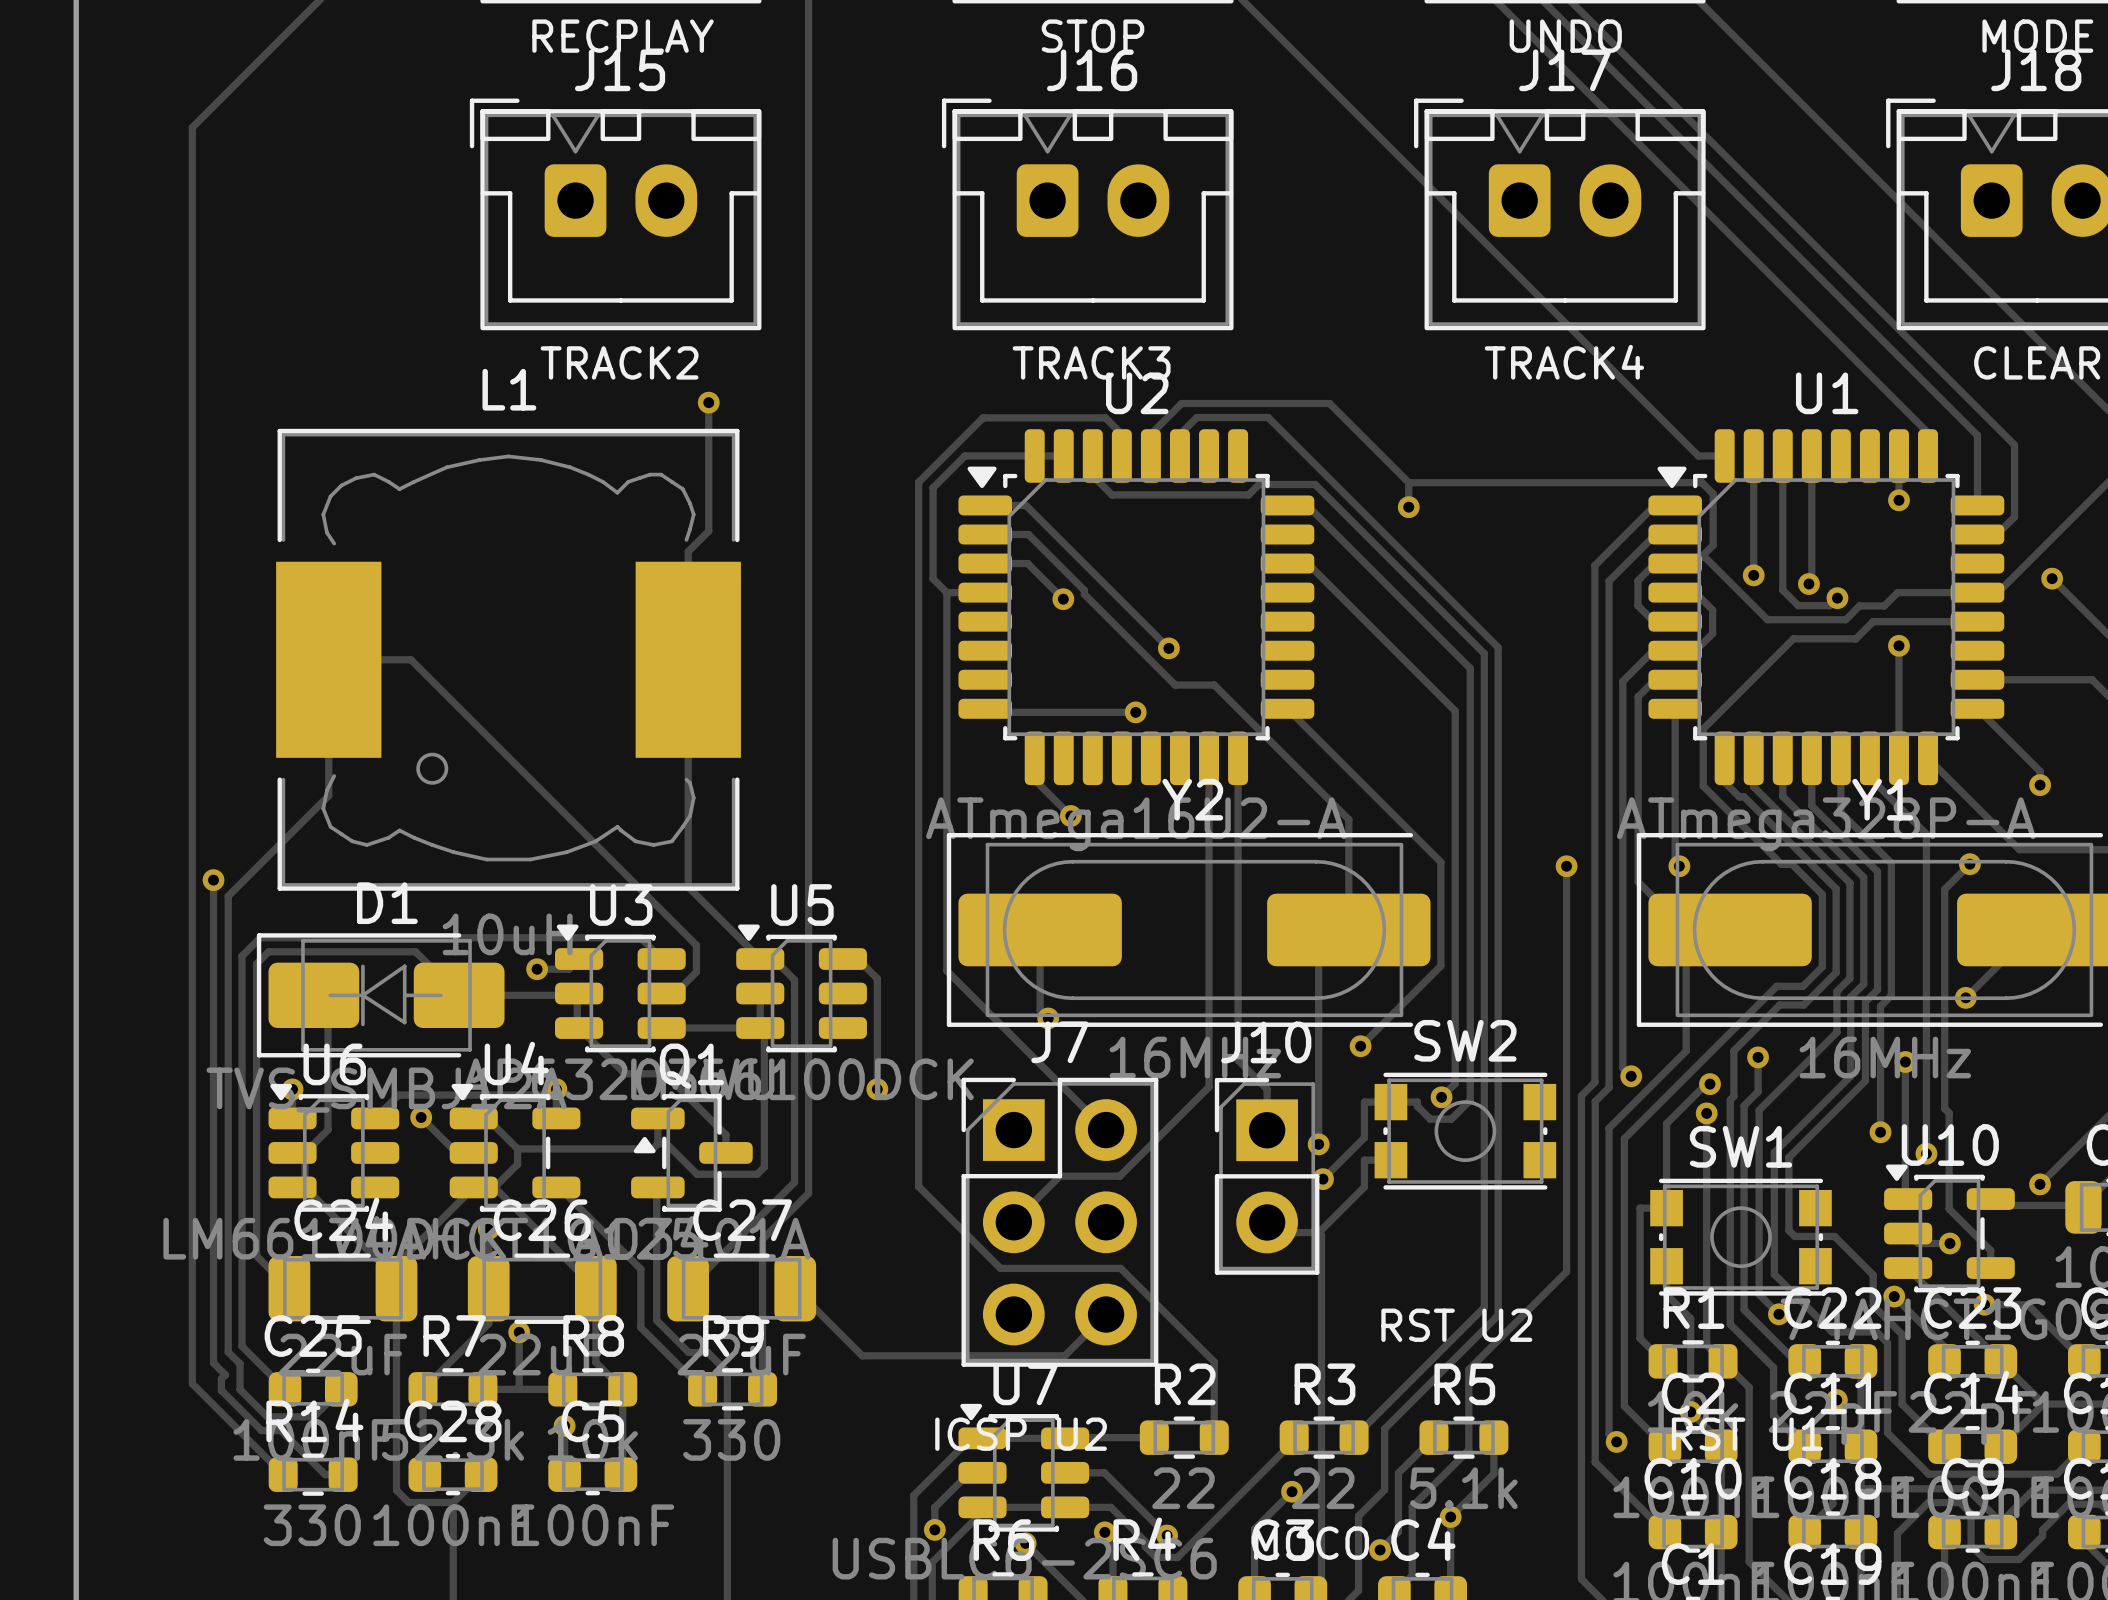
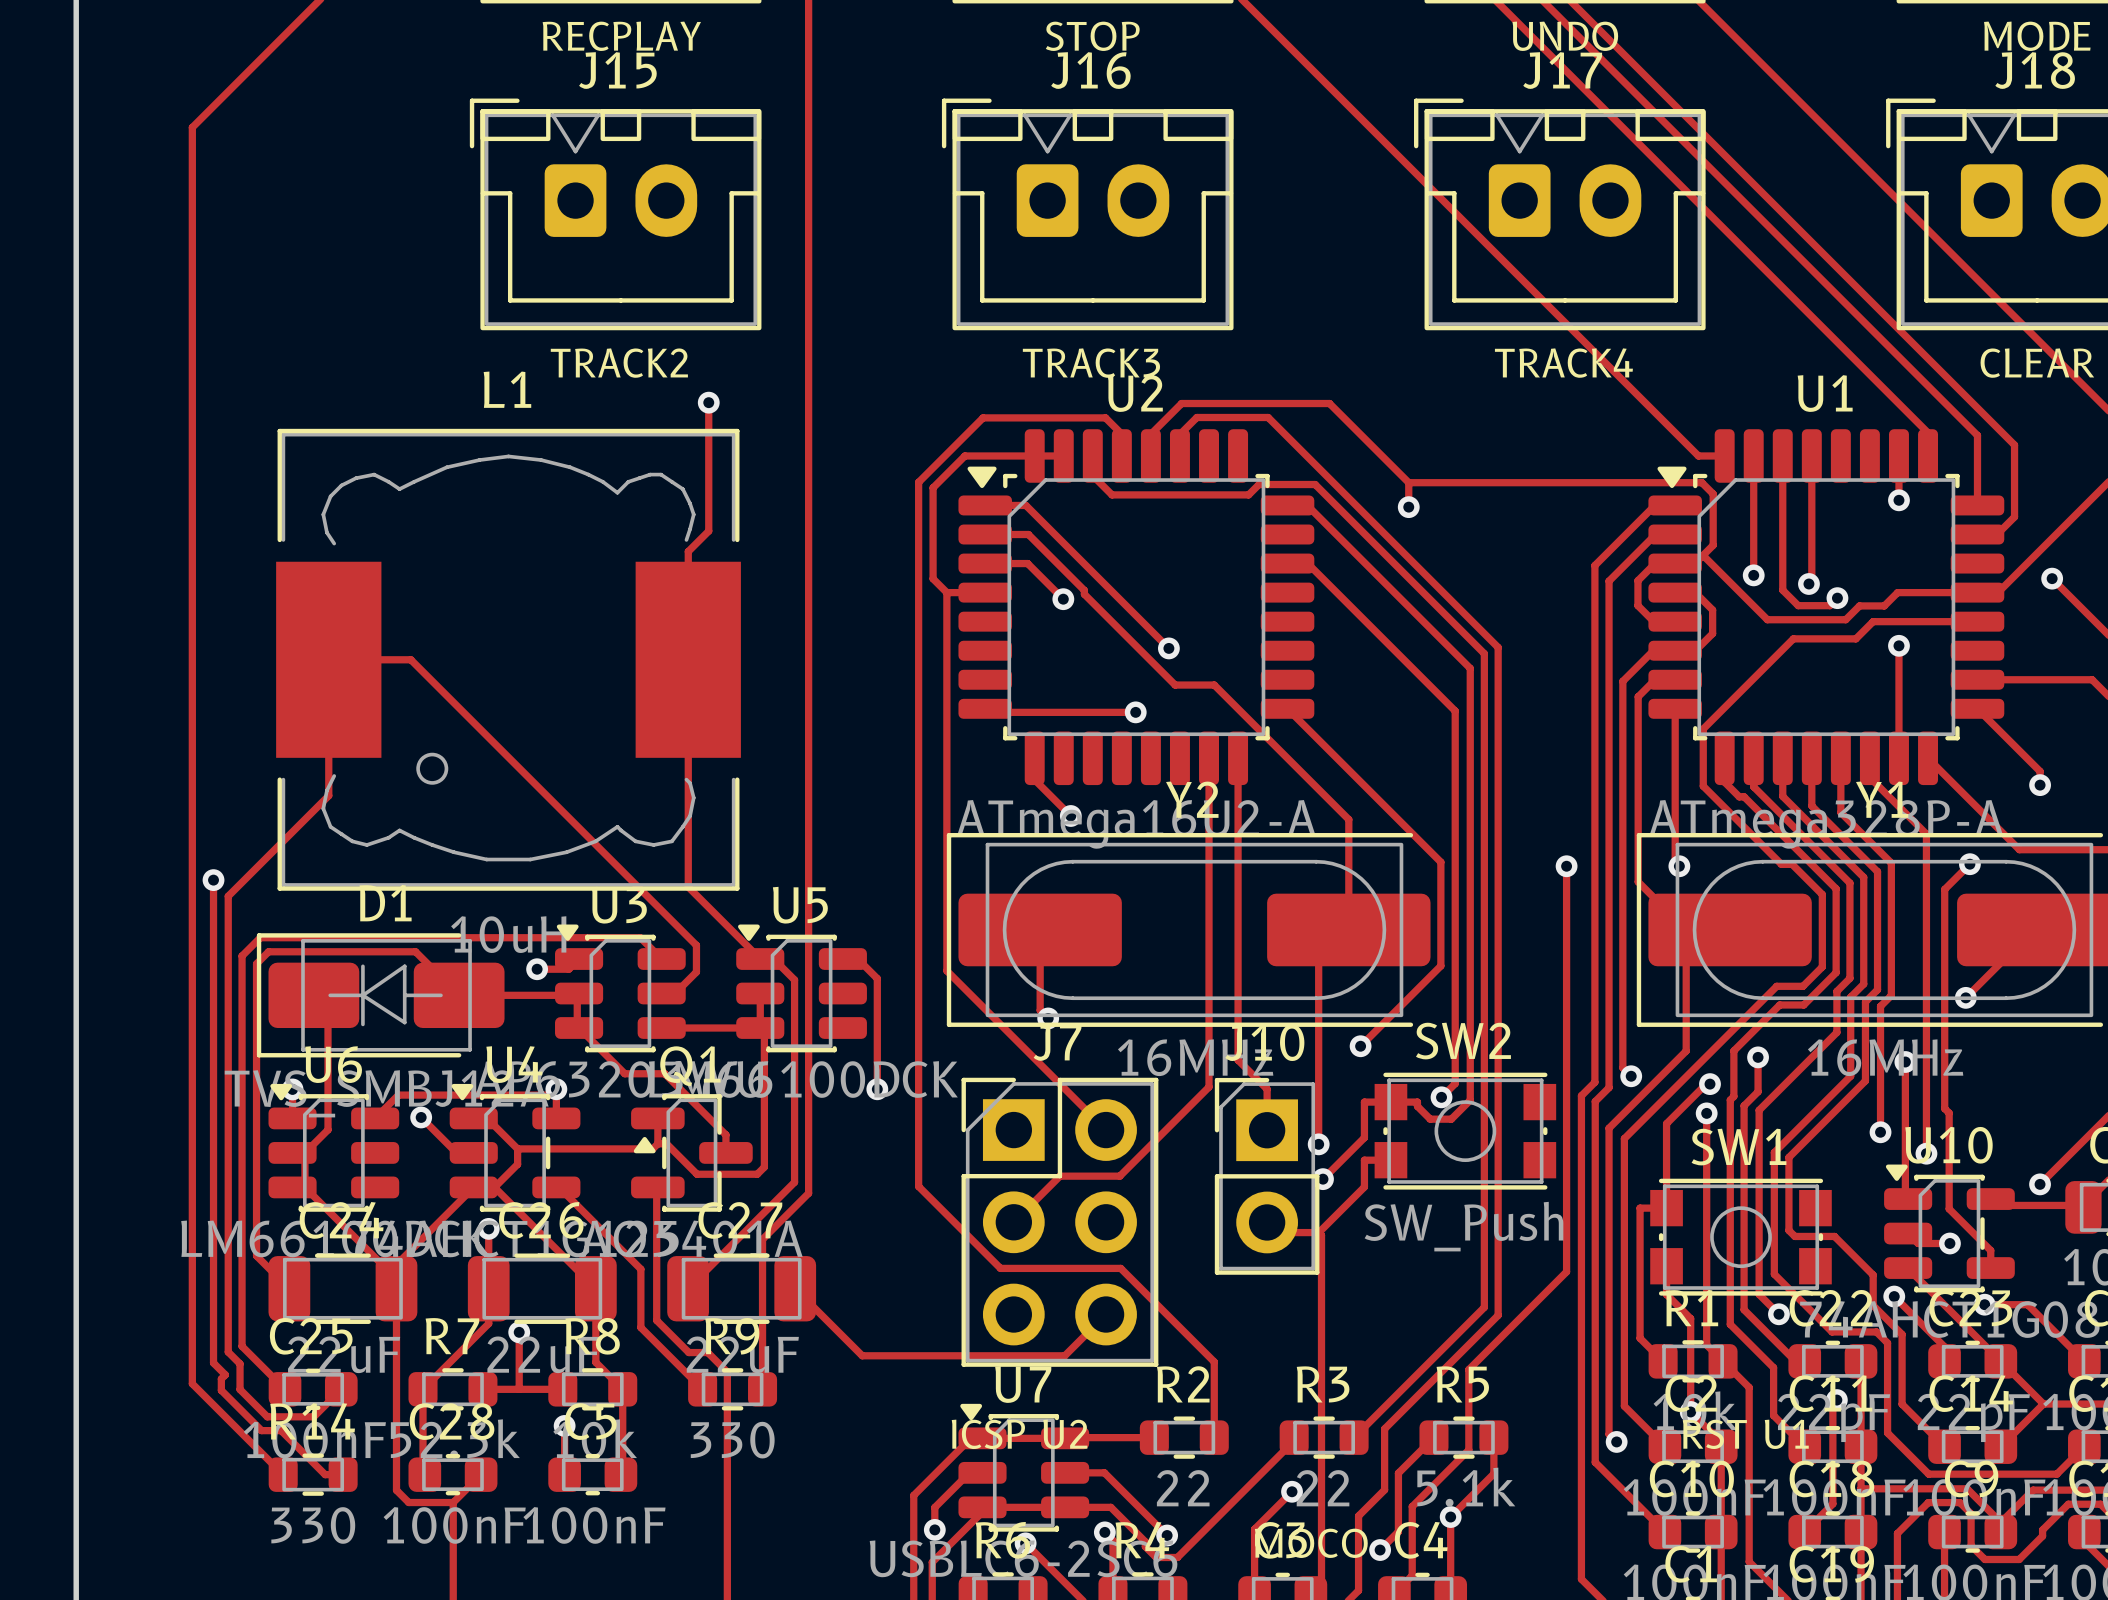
SW2 value: RST U2 (1456, 1325) -> SW_Push (1463, 1226)

